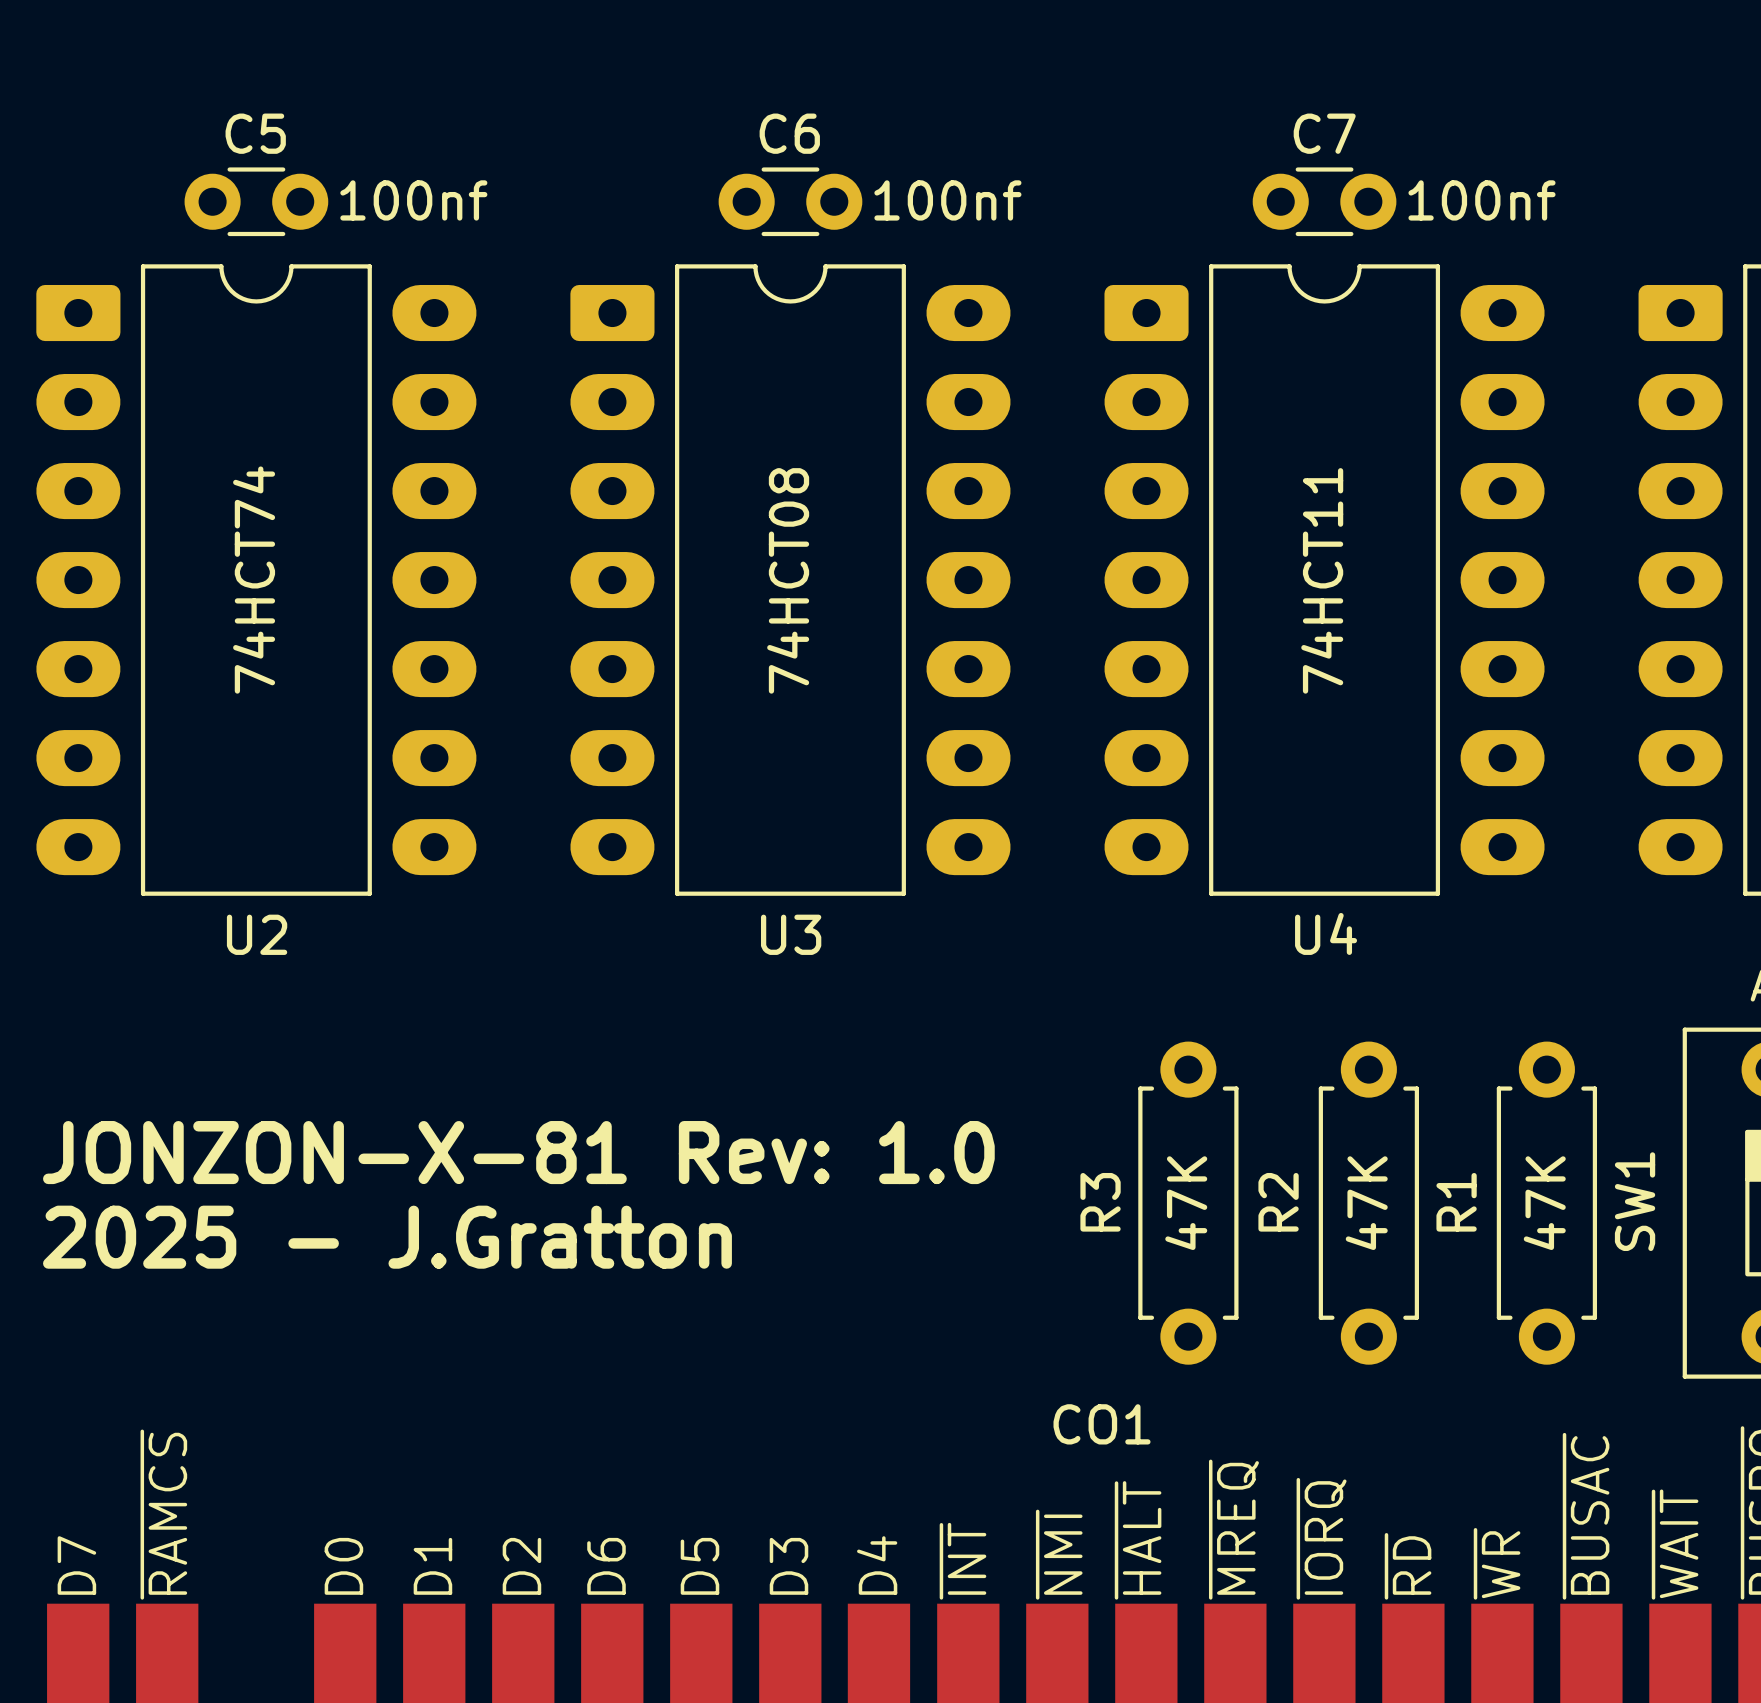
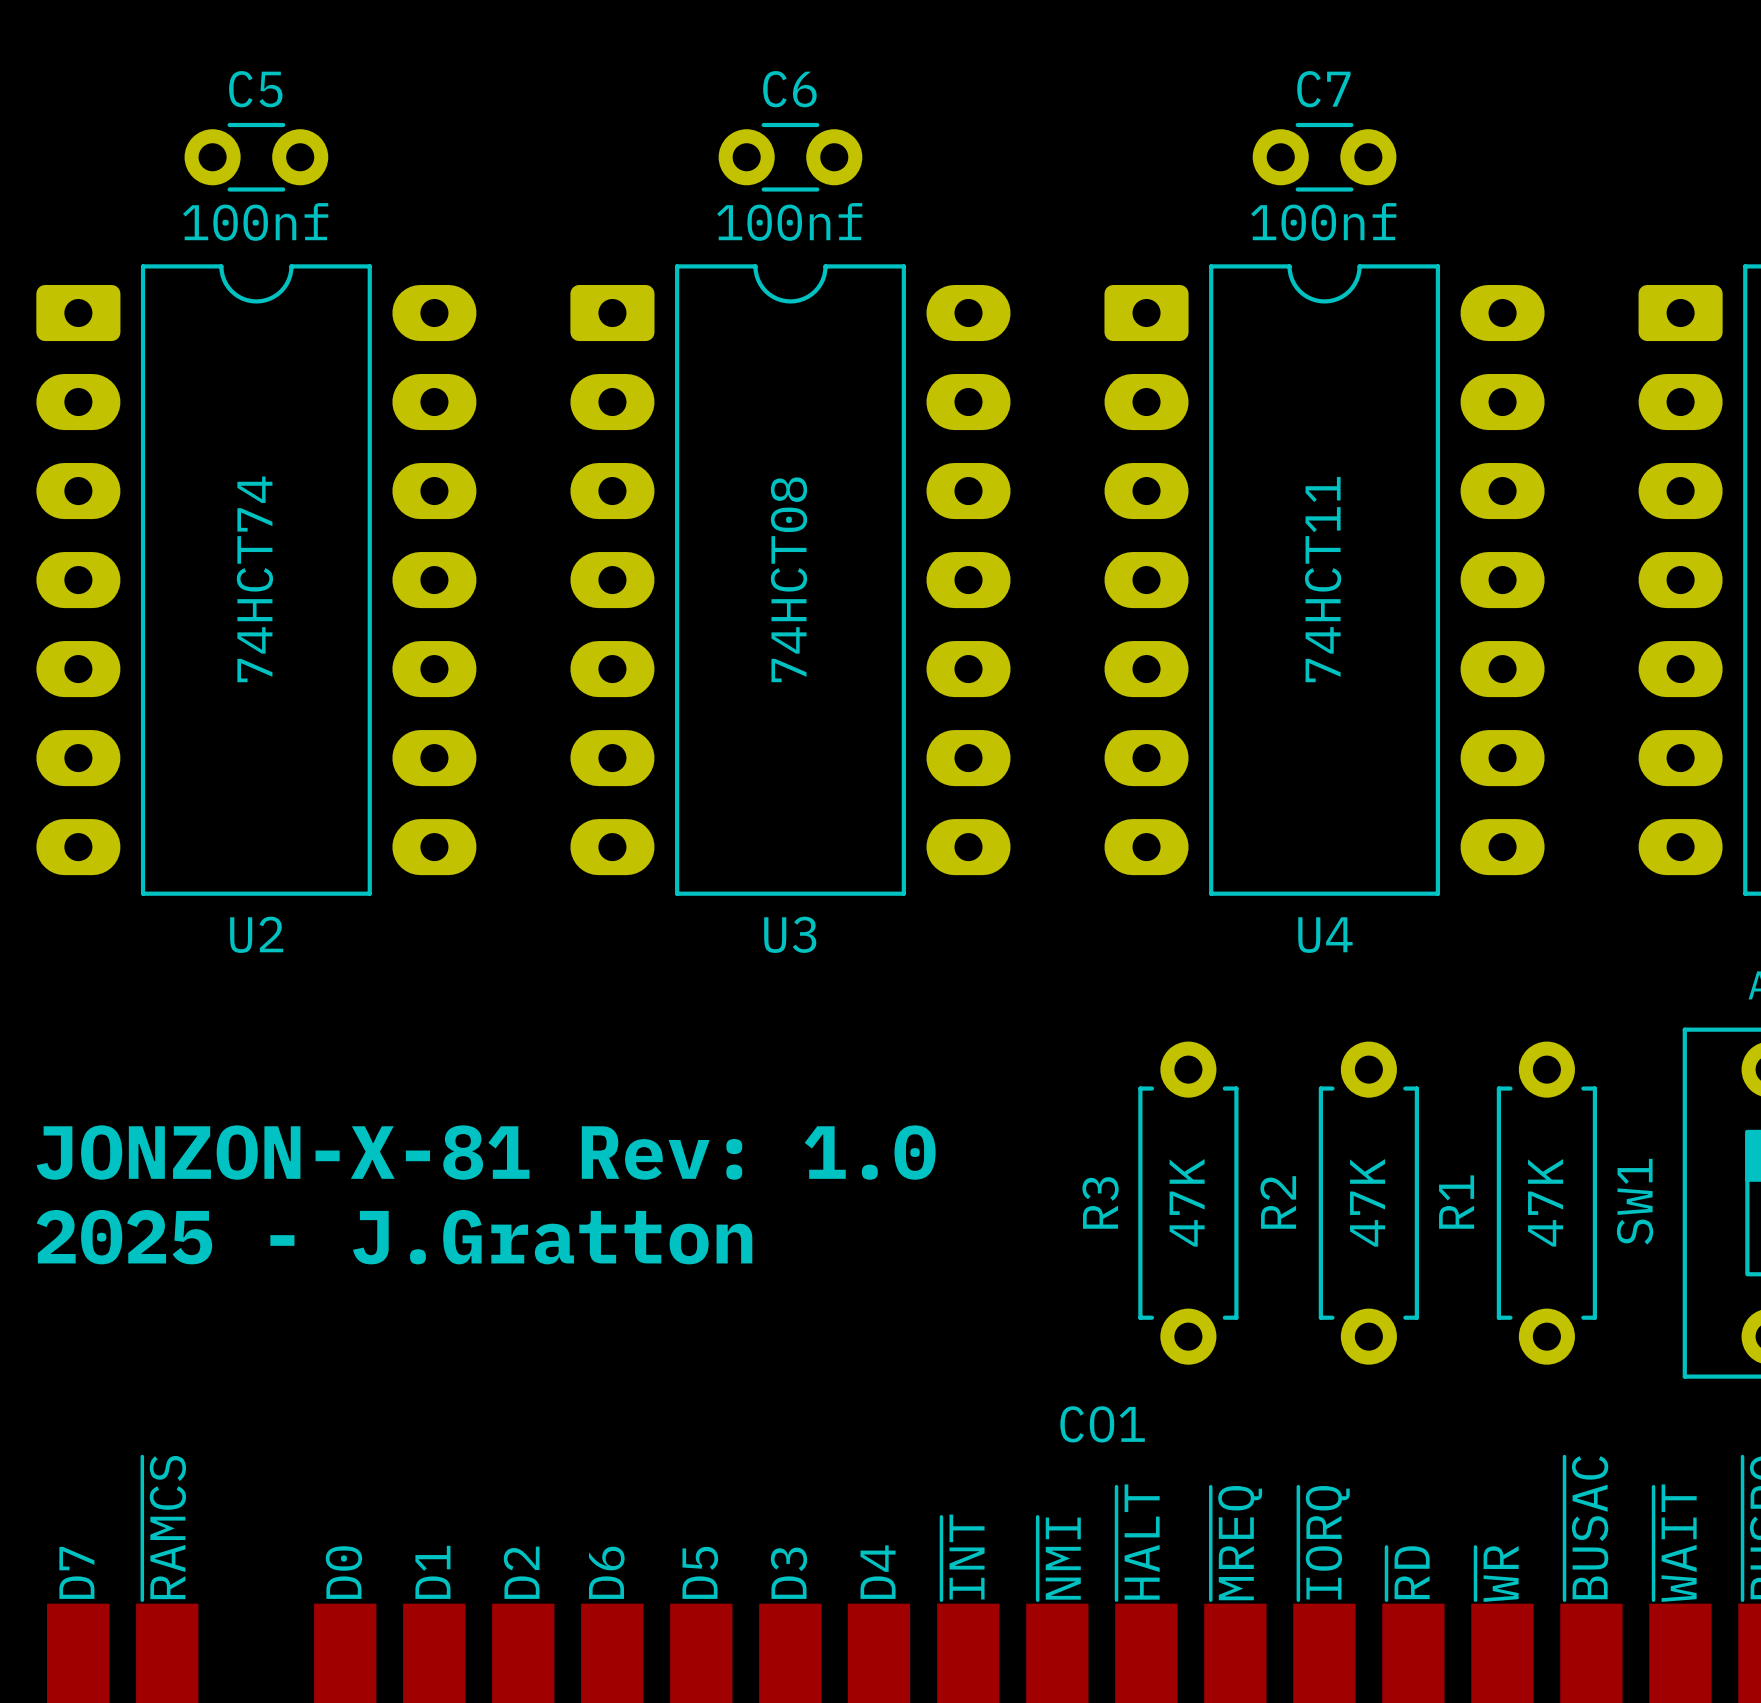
C5 value position: 100nf (413, 200) -> 100nf (255, 221)
C6 value position: 100nf (947, 200) -> 100nf (789, 221)
C7 value position: 100nf (1481, 200) -> 100nf (1323, 221)
C5 position: (256, 201) -> (256, 157)
C6 position: (790, 201) -> (790, 157)
C7 position: (1324, 201) -> (1324, 157)

